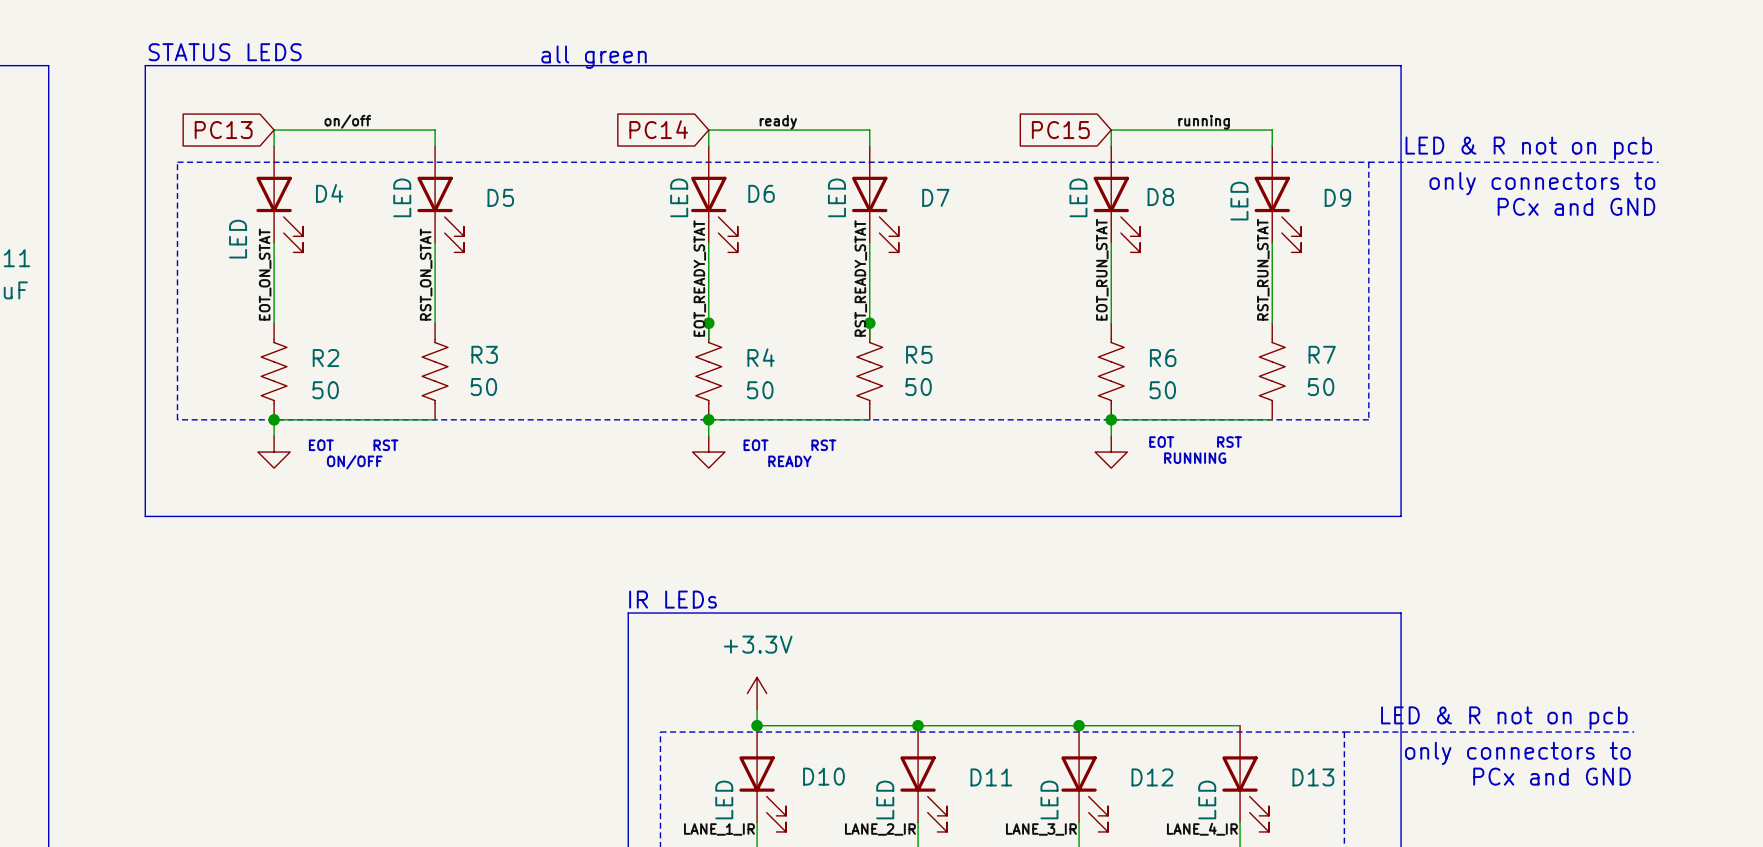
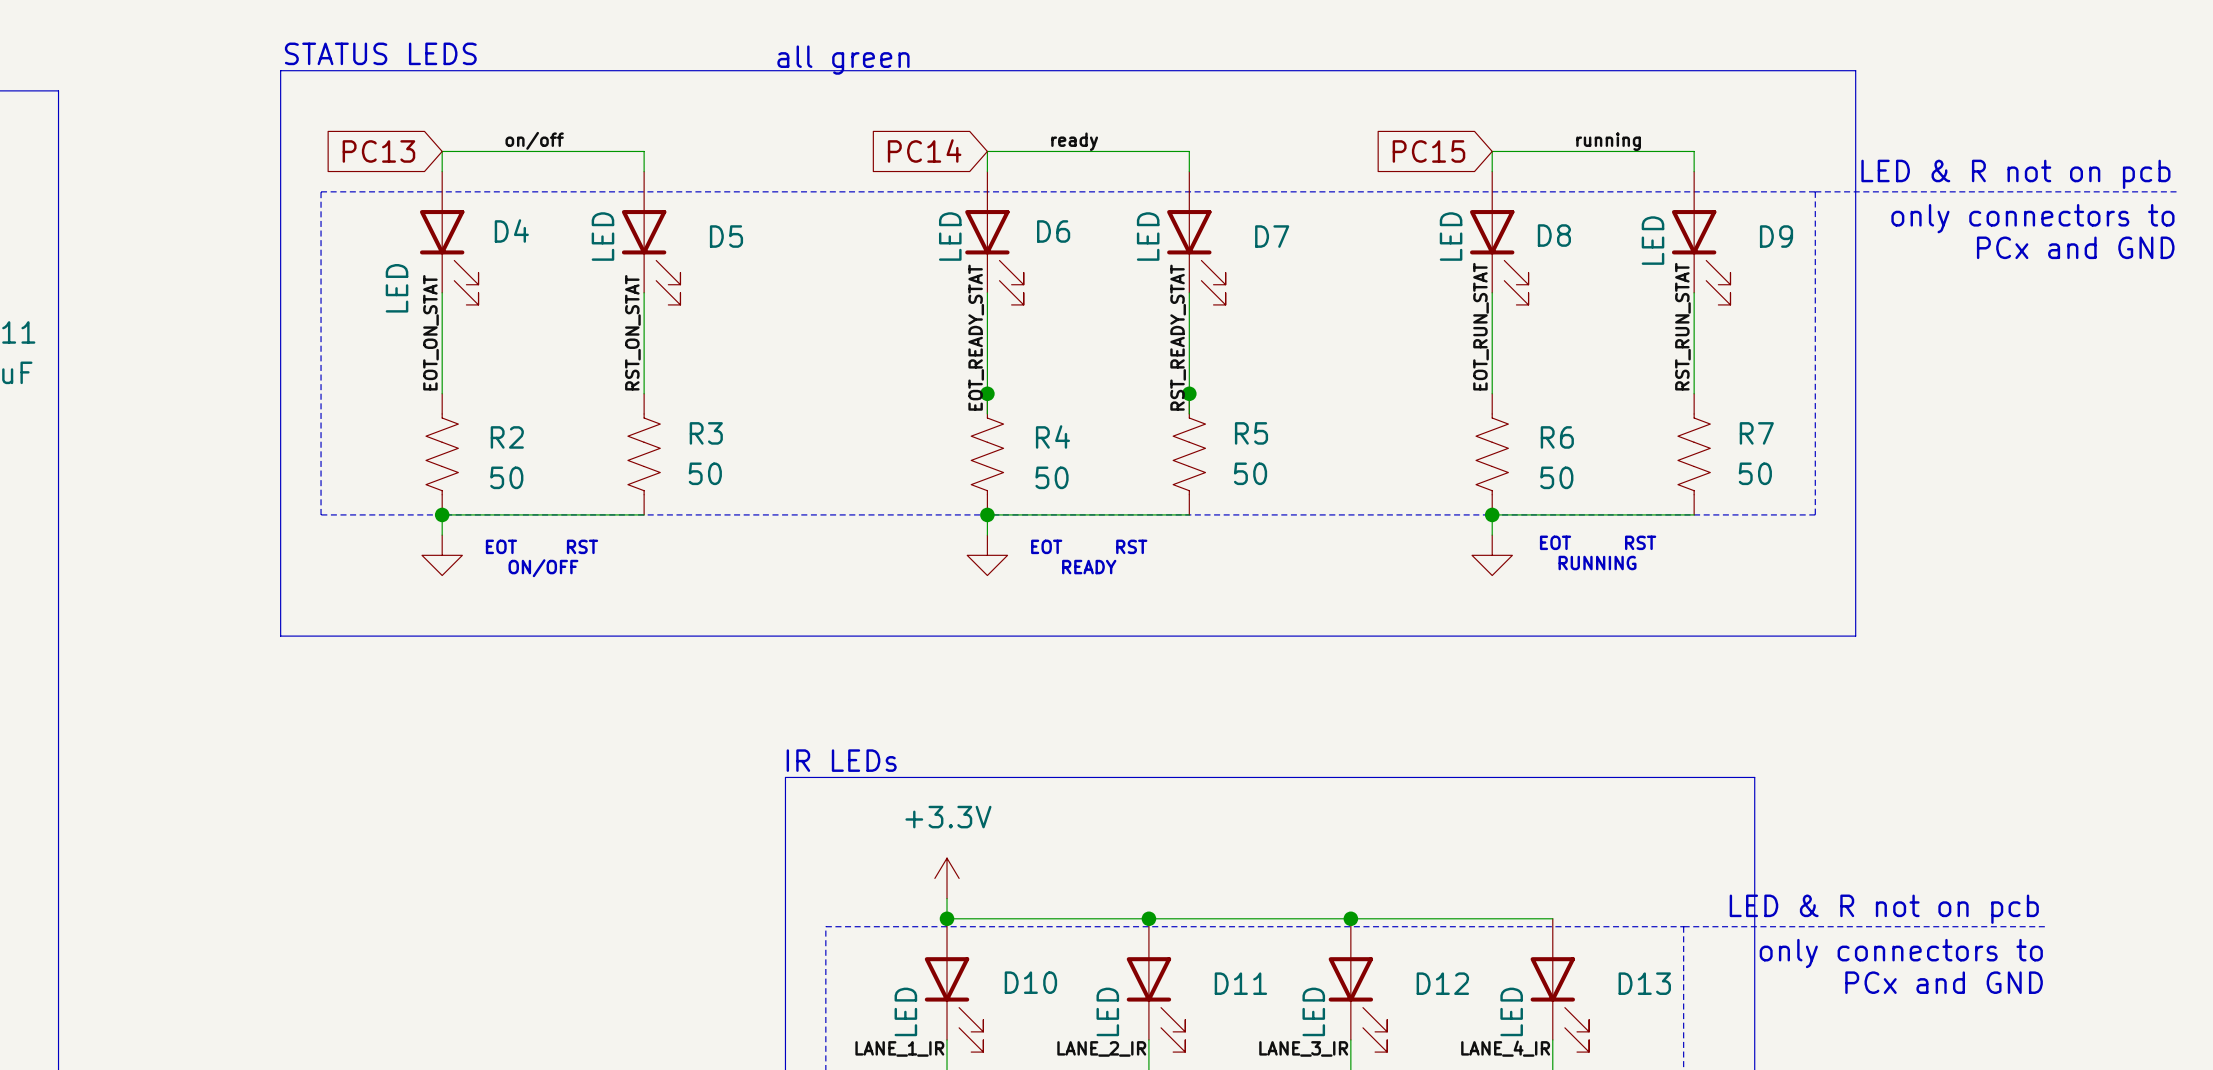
text position: STATUS LEDS (225, 52) -> STATUS LEDS (380, 53)
text position: all green (594, 57) -> all green (843, 60)
line: (145, 65) (1401, 65) (1401, 516) (145, 516) (145, 65) -> (280, 70) (1855, 70) (1855, 636) (280, 636) (280, 70)
label position: on/off (347, 121) -> on/off (534, 140)
label position: ready (778, 122) -> ready (1074, 141)
label position: running (1204, 122) -> running (1608, 141)
global label position: PC14 (658, 129) -> PC14 (924, 150)
global label position: PC13 (223, 130) -> PC13 (378, 151)
global label position: PC15 (1060, 130) -> PC15 (1428, 151)
wire: (274, 146) (274, 130) (435, 130) (435, 146) -> (442, 171) (442, 151) (644, 151) (644, 171)
wire: (708, 146) (708, 130) (869, 130) (869, 146) -> (987, 171) (987, 151) (1189, 151) (1189, 171)
wire: (1111, 146) (1111, 130) (1272, 130) (1272, 146) -> (1492, 171) (1492, 151) (1694, 151) (1694, 171)
text position: LED & R not on pcb (1528, 148) -> LED & R not on pcb (2015, 174)
line: (1368, 162) (1368, 419) (177, 419) (177, 162) (1658, 162) -> (1815, 191) (1815, 514) (321, 514) (321, 191) (2178, 191)
text position: only connectors to (1542, 183) -> only connectors to (2032, 218)
D4 position: (279, 199) -> (449, 238)
D5 position: (440, 199) -> (651, 238)
D6 position: (714, 199) -> (994, 238)
D7 position: (875, 199) -> (1196, 238)
D8 position: (1116, 199) -> (1499, 238)
D9 position: (1277, 199) -> (1701, 238)
text position: PCx and GND (1576, 206) -> PCx and GND (2075, 247)
wire: (274, 242) (274, 323) -> (442, 292) (442, 393)
wire: (435, 242) (435, 323) -> (644, 292) (644, 393)
wire: (708, 242) (708, 339) -> (987, 292) (987, 413)
wire: (869, 242) (869, 339) -> (1189, 292) (1189, 413)
wire: (1111, 242) (1111, 323) -> (1492, 292) (1492, 393)
wire: (1272, 242) (1272, 323) -> (1694, 292) (1694, 393)
label position: EOT_RUN_STAT (1102, 269) -> EOT_RUN_STAT (1481, 326)
label position: RST_RUN_STAT (1263, 269) -> RST_RUN_STAT (1682, 326)
label position: EOT_ON_STAT (265, 274) -> EOT_ON_STAT (430, 332)
label position: RST_ON_STAT (426, 274) -> RST_ON_STAT (632, 332)
label position: EOT_READY_STAT (699, 278) -> EOT_READY_STAT (976, 337)
label position: RST_READY_STAT (860, 278) -> RST_READY_STAT (1178, 337)
junction: none -> (987, 393)
junction: none -> (1189, 393)
junction: (708, 323) -> none
junction: (869, 323) -> none
R2 position: (274, 371) -> (442, 454)
R3 position: (435, 371) -> (644, 454)
R4 position: (708, 371) -> (987, 454)
R5 position: (869, 371) -> (1189, 454)
R6 position: (1111, 371) -> (1492, 454)
R7 position: (1272, 371) -> (1694, 454)
junction: none -> (442, 514)
junction: none -> (987, 514)
junction: none -> (1492, 514)
junction: (274, 419) -> none
wire: (435, 419) (274, 419) (274, 435) -> (644, 514) (442, 514) (442, 535)
junction: (708, 419) -> none
wire: (869, 419) (708, 419) (708, 435) -> (1189, 514) (987, 514) (987, 535)
junction: (1111, 419) -> none
wire: (1272, 419) (1111, 419) (1111, 435) -> (1694, 514) (1492, 514) (1492, 535)
text position: EOT (1161, 442) -> EOT (1555, 542)
text position: RST (1229, 442) -> RST (1640, 542)
text position: EOT (321, 445) -> EOT (501, 546)
text position: RST (385, 445) -> RST (582, 546)
text position: EOT (756, 445) -> EOT (1046, 546)
text position: RST (823, 445) -> RST (1131, 546)
power symbol position: (274, 452) -> (442, 555)
power symbol position: (708, 452) -> (987, 555)
power symbol position: (1111, 452) -> (1492, 555)
text position: RUNNING (1195, 458) -> RUNNING (1597, 563)
text position: READY (789, 461) -> READY (1089, 567)
text position: ON/OFF (354, 462) -> ON/OFF (543, 568)

